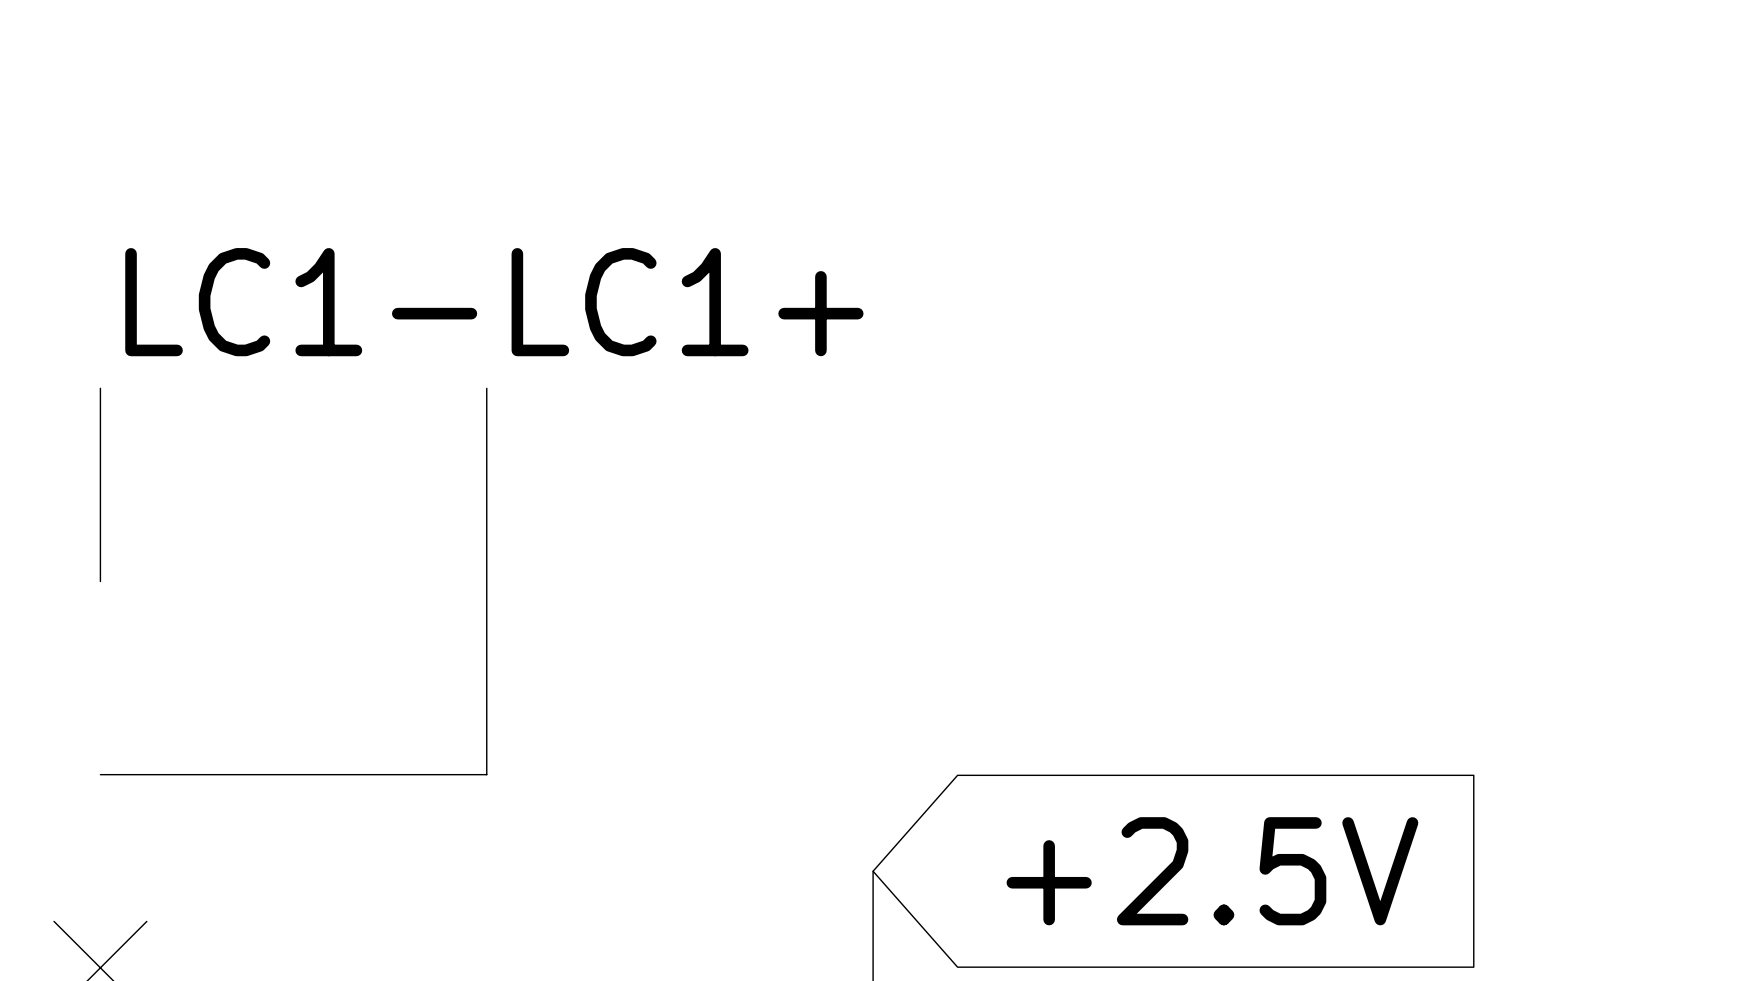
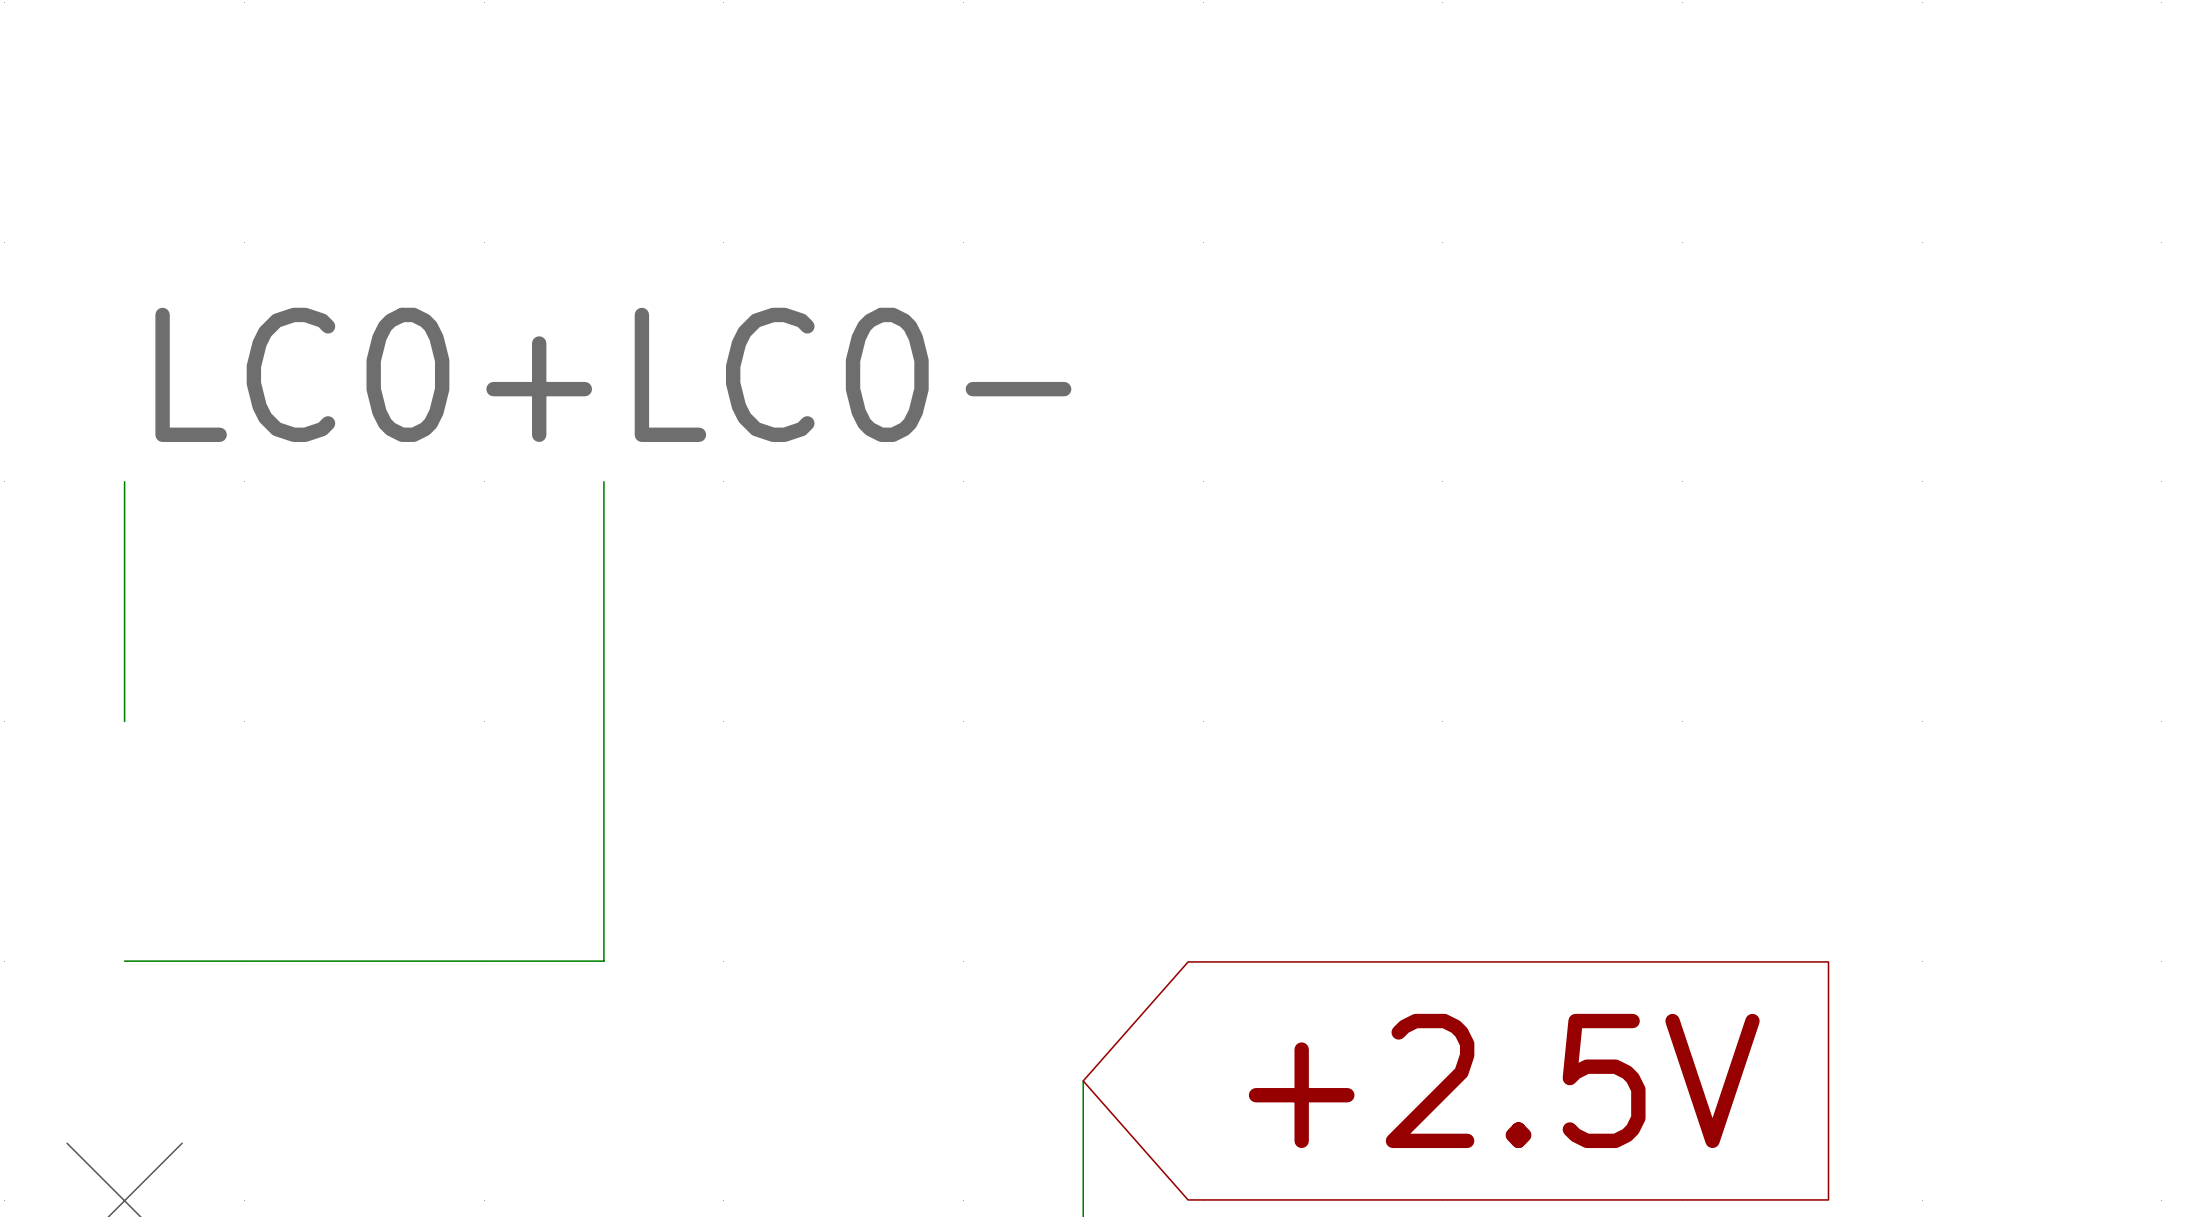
label: LC1- (301, 302) -> LC0+ (373, 374)
label: LC1+ (687, 302) -> LC0- (853, 374)

